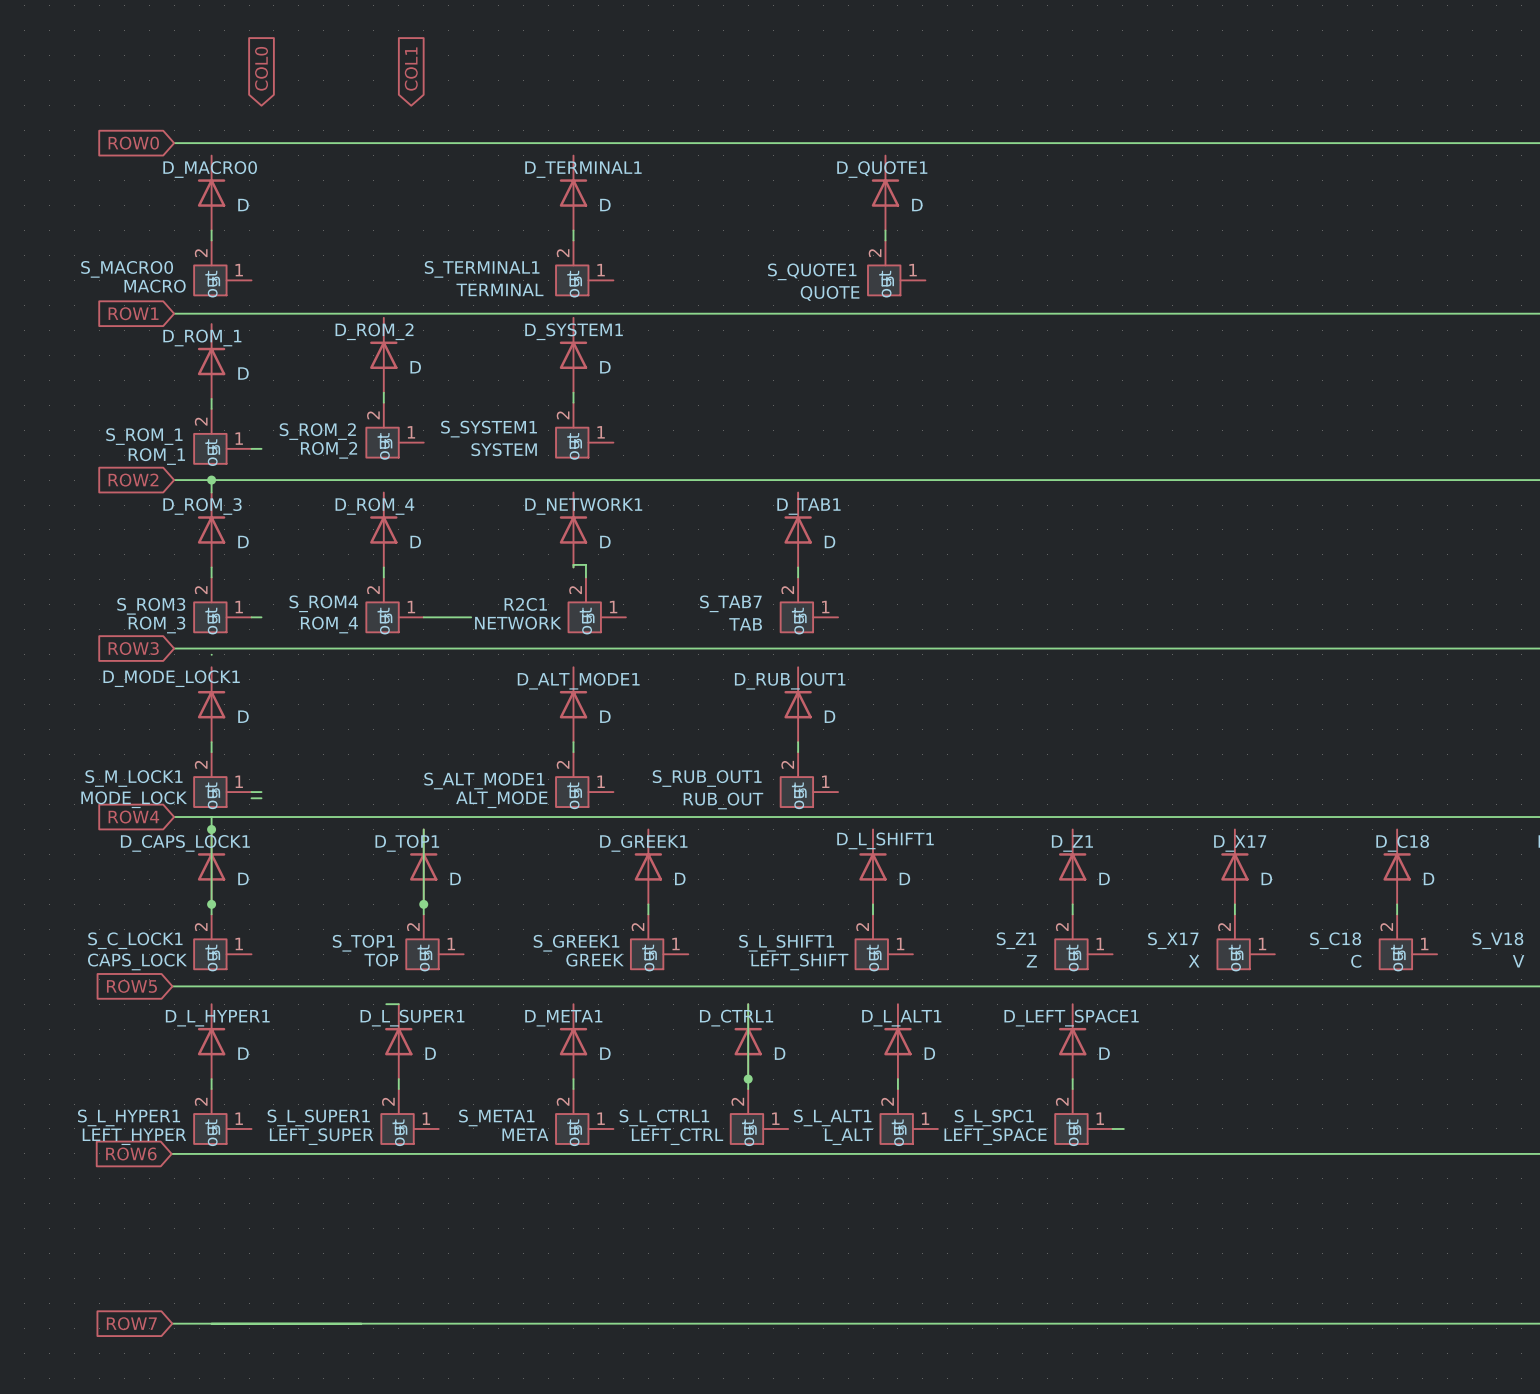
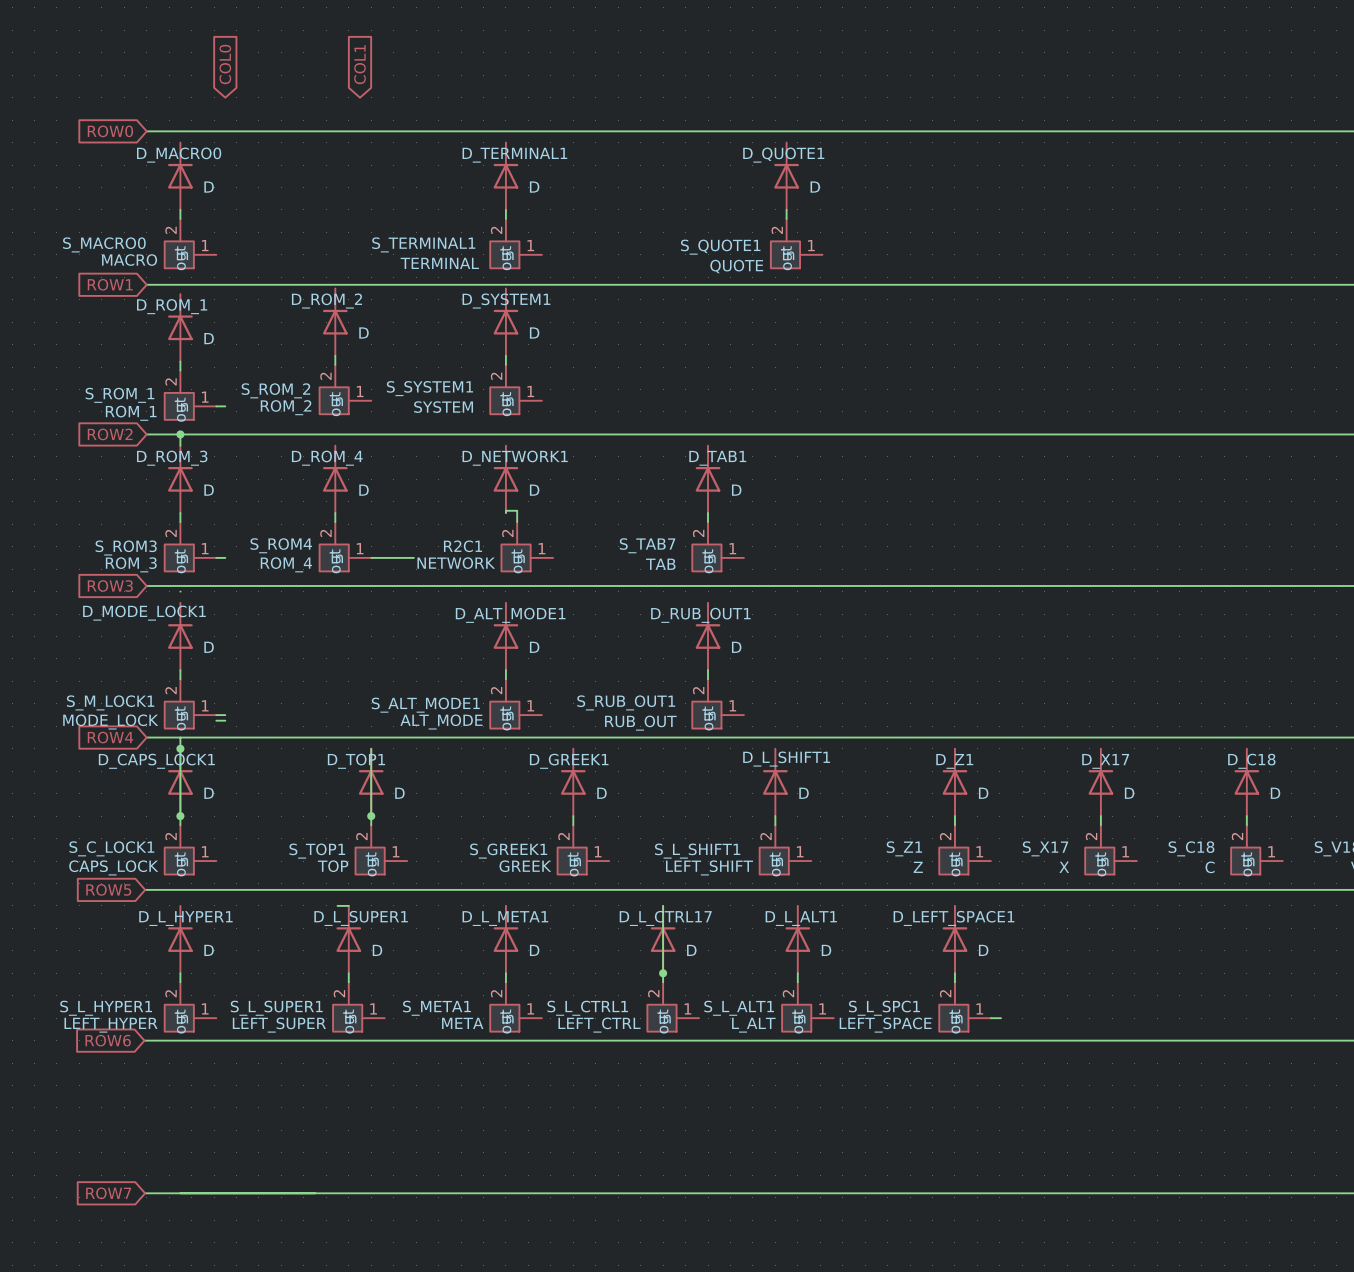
D_META1 name: D_META1 (563, 1018) -> D_L_META1 (505, 918)
D_CTRL1 name: D_CTRL1 (736, 1018) -> D_L_CTRL17 (665, 918)

